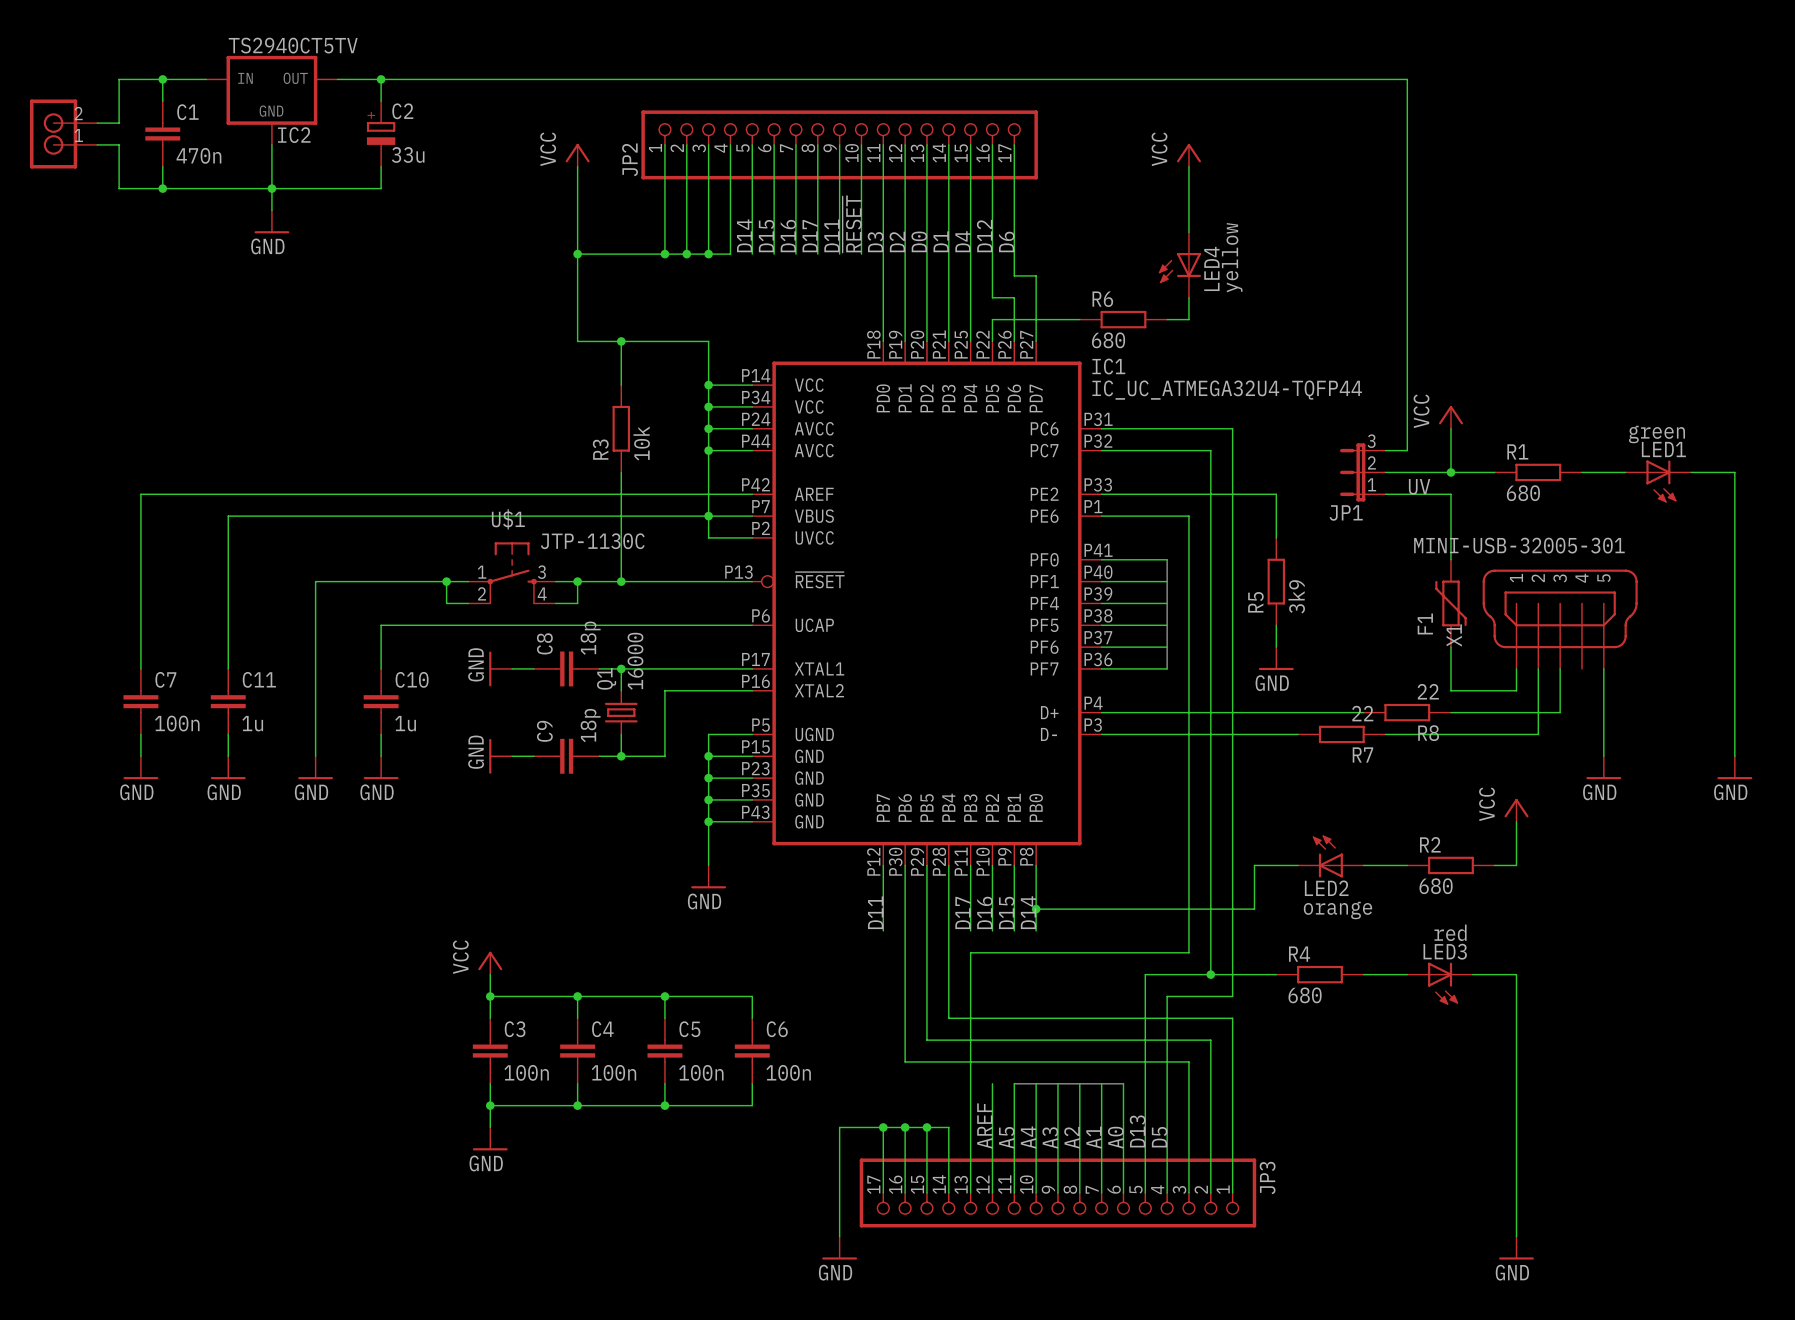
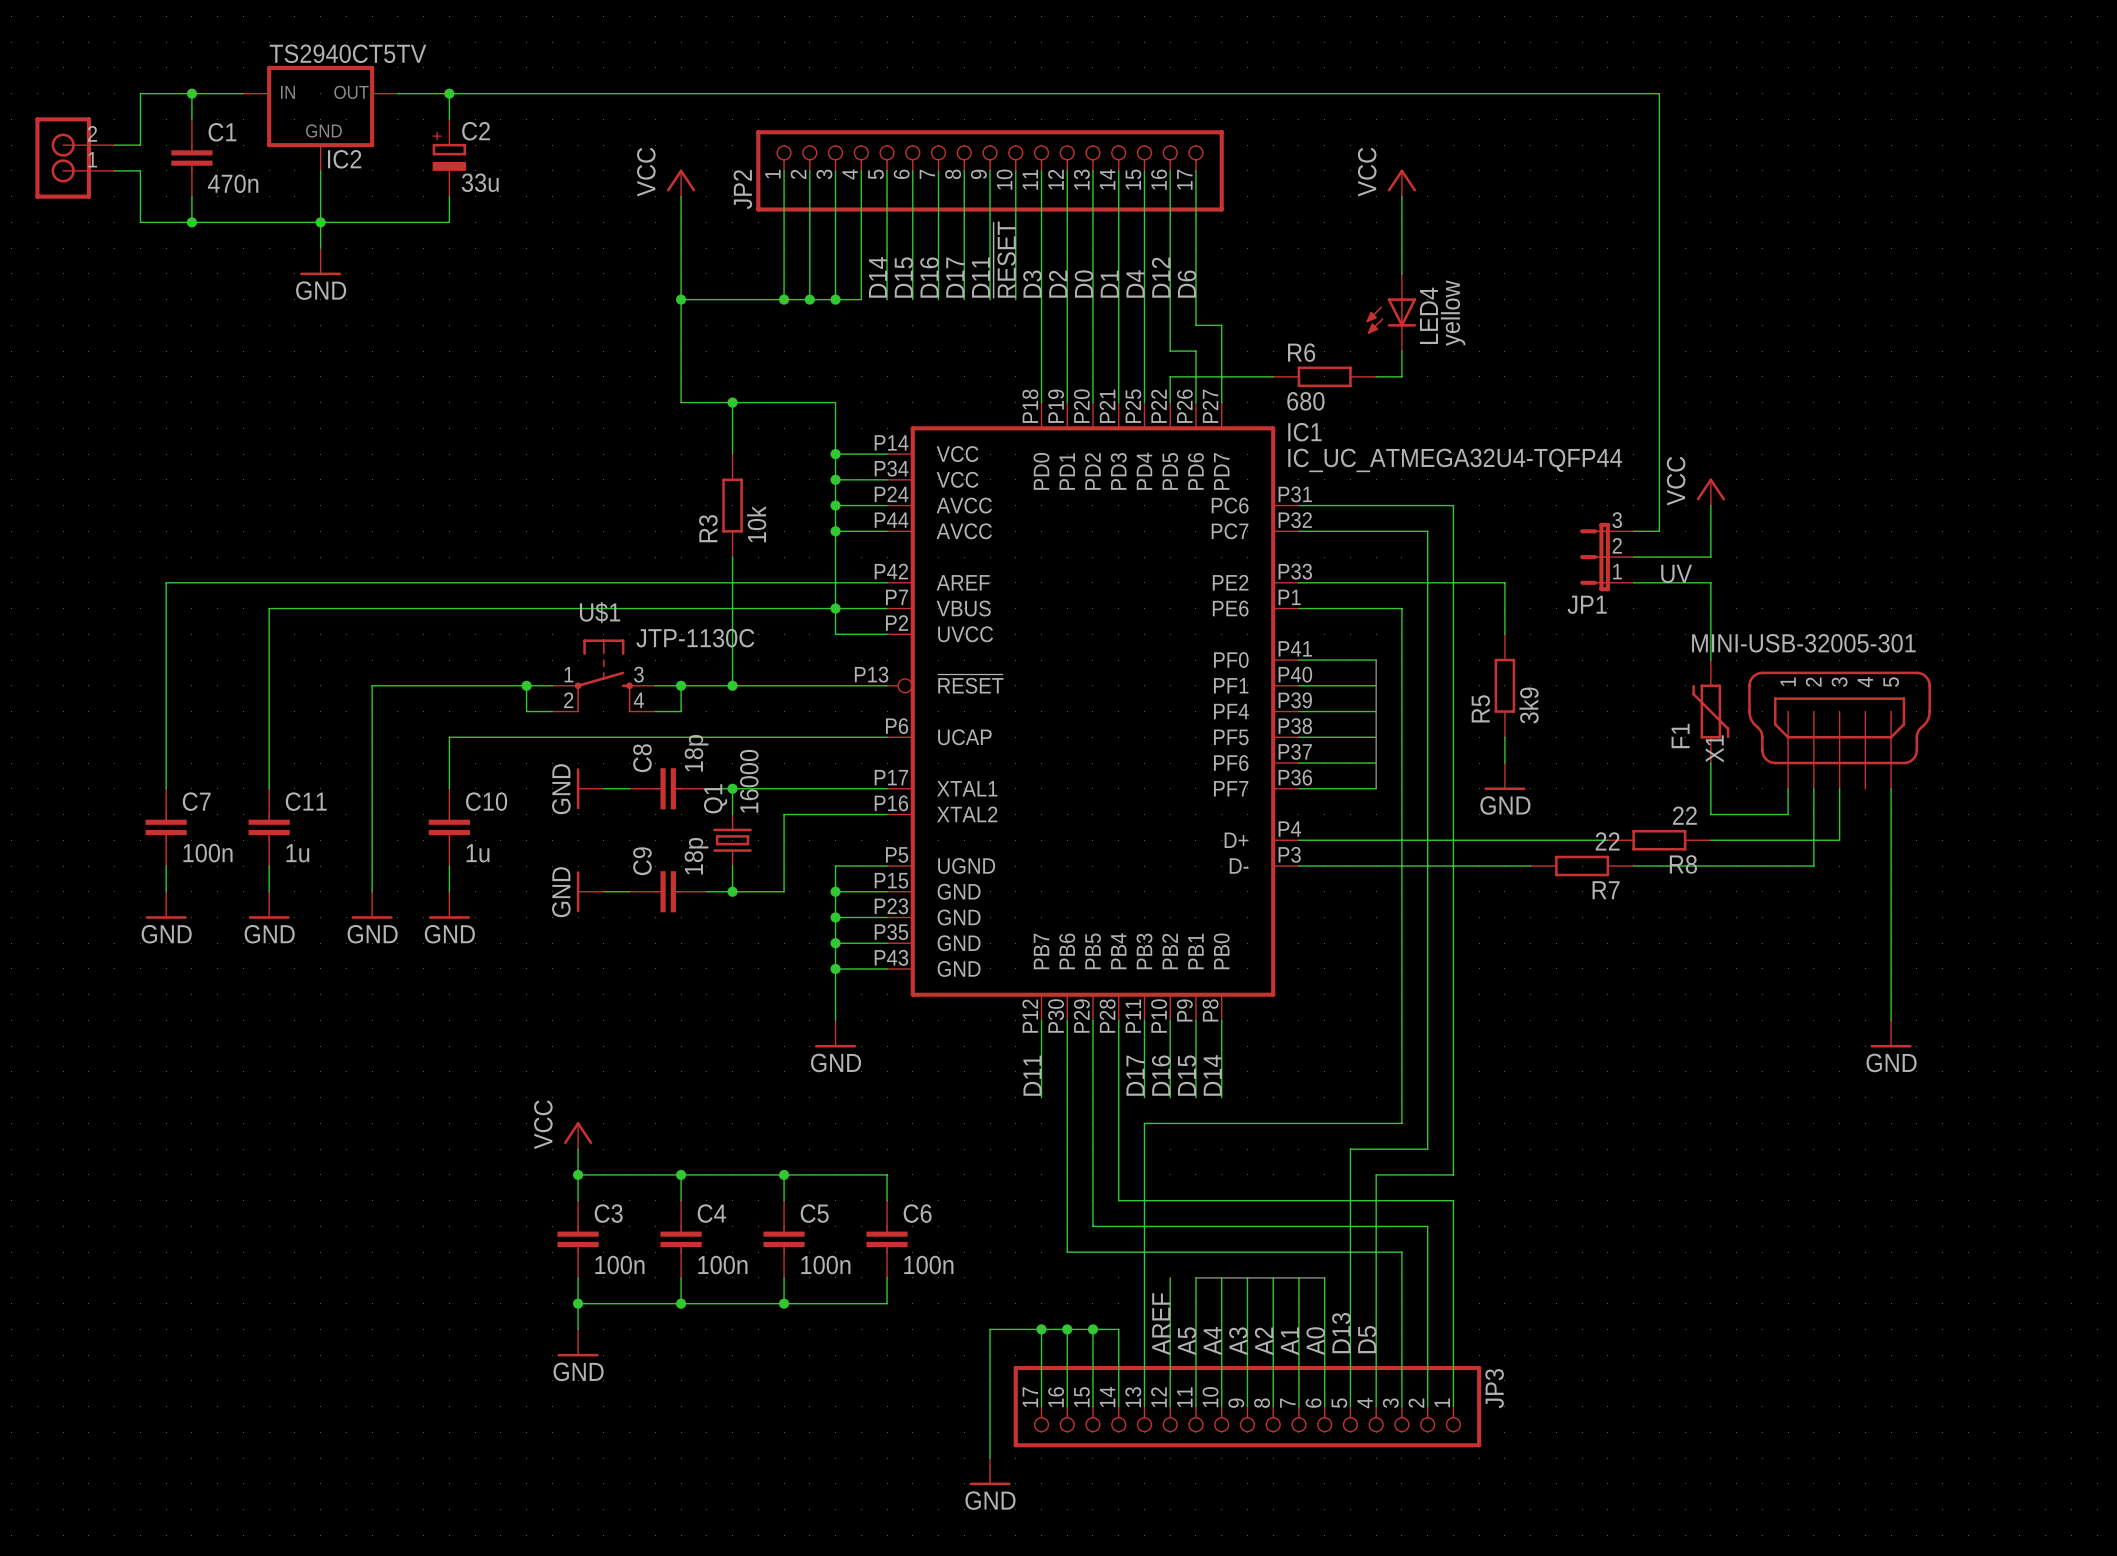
wire: (1450, 472) (1494, 472) -> none
junction: (1450, 472) -> none
R1: 680 (1538, 472) -> none
wire: (1581, 472) (1625, 472) -> none
wire: (1691, 472) (1734, 472) (1734, 756) -> none
LED1: green (1658, 481) -> none
wire: none -> (1891, 891) (1891, 1020)
power symbol: GND (1603, 767) -> none
power symbol: GND (1734, 767) -> none
power symbol: VCC (1516, 810) -> none
wire: (1516, 821) (1516, 865) (1494, 865) -> none
LED2: orange (1330, 856) -> none
wire: (1298, 865) (1254, 865) (1254, 909) (1036, 909) -> none
wire: (1363, 865) (1407, 865) -> none
R2: 680 (1450, 865) -> none
power symbol: none -> GND (1891, 1033)
junction: (1036, 909) -> none
wire: (1210, 974) (1276, 974) -> none
junction: (1210, 974) -> none
R4: 680 (1319, 974) -> none
wire: (1363, 974) (1407, 974) -> none
wire: (1472, 974) (1516, 974) (1516, 1236) -> none
LED3: red (1440, 983) -> none
power symbol: GND (1516, 1248) -> none

